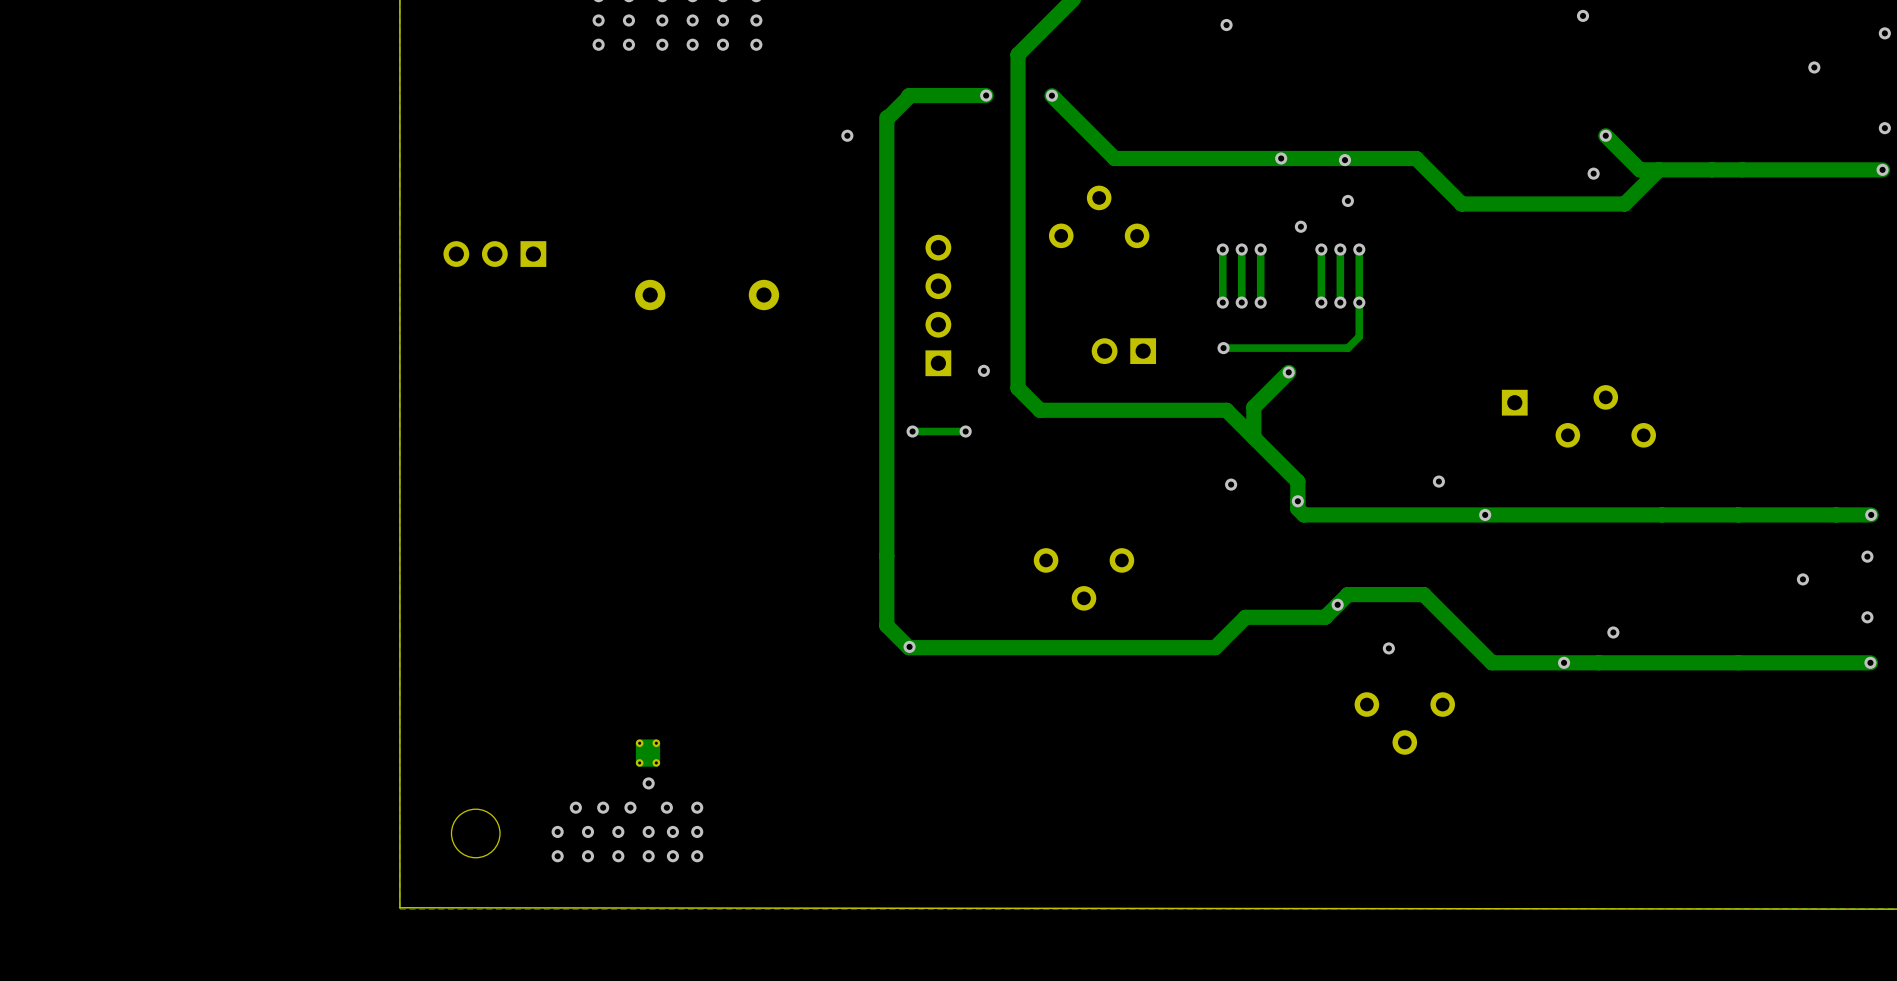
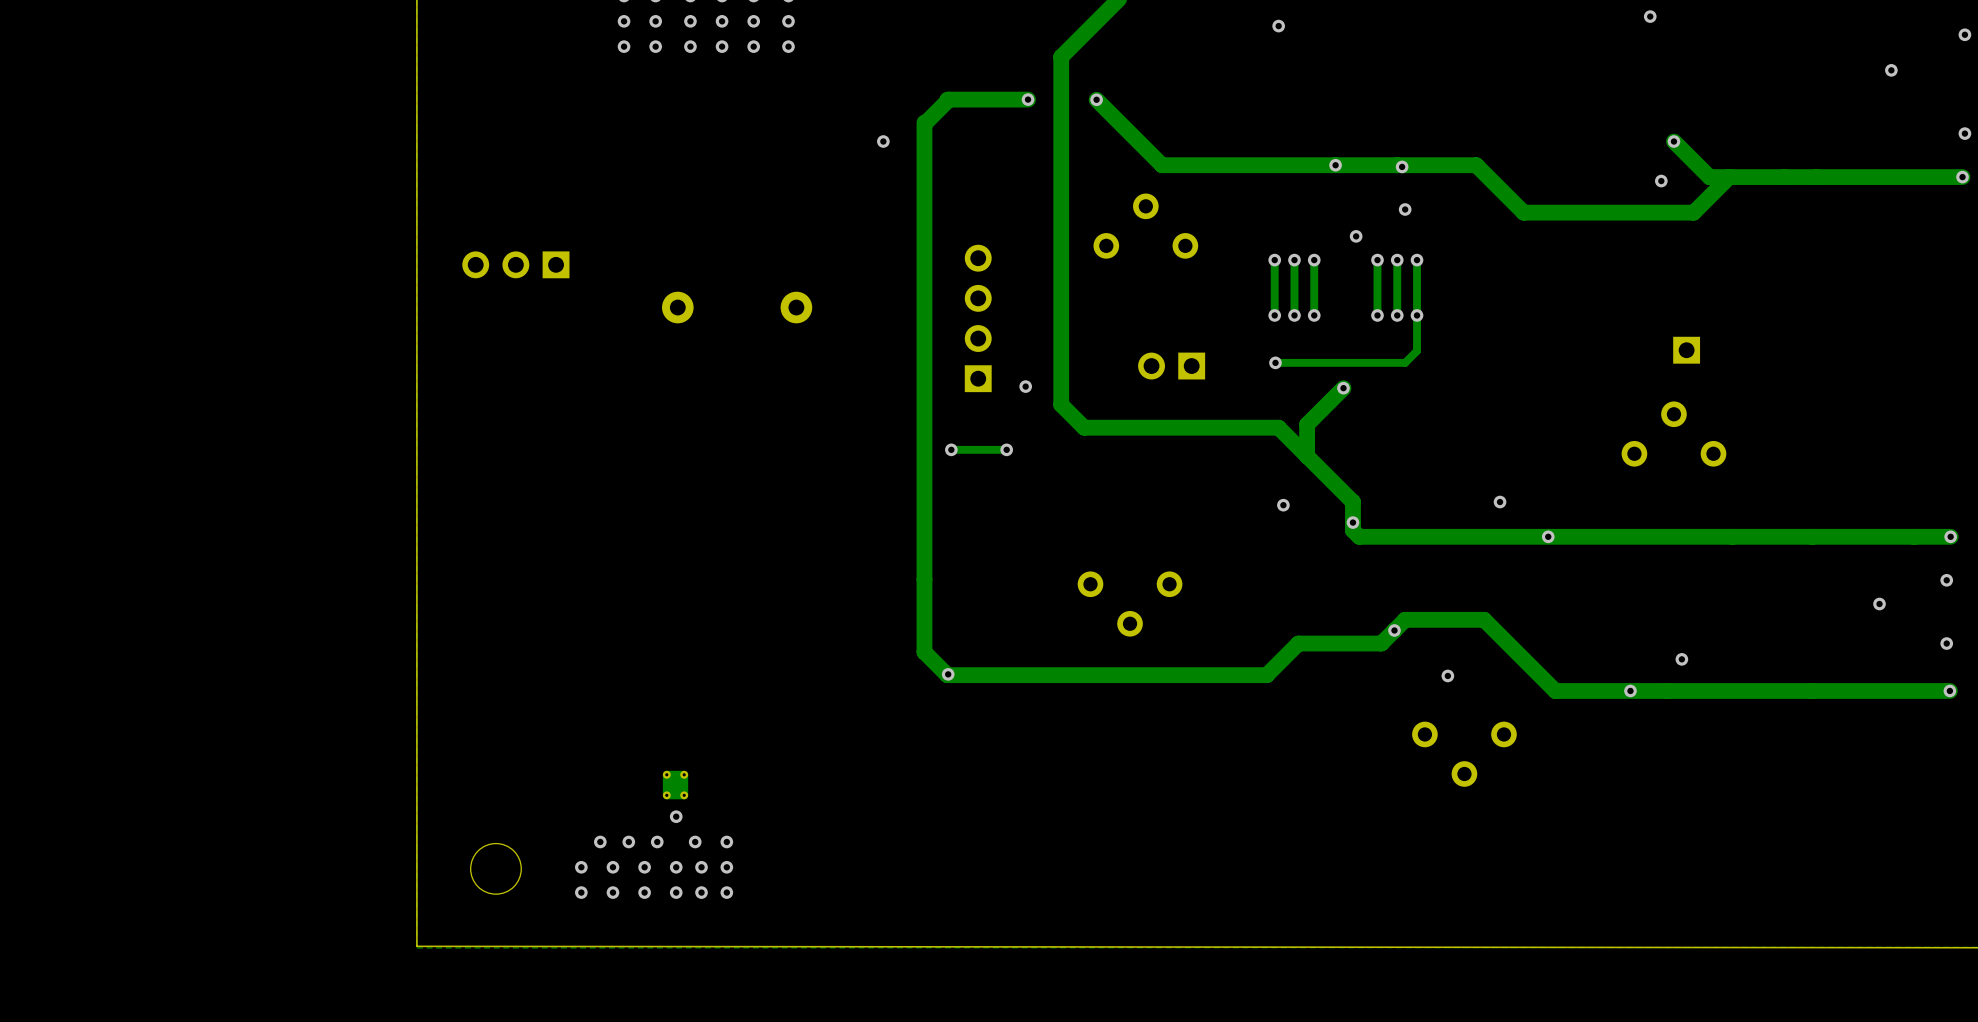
part position: (1514, 402) -> (1686, 350)

